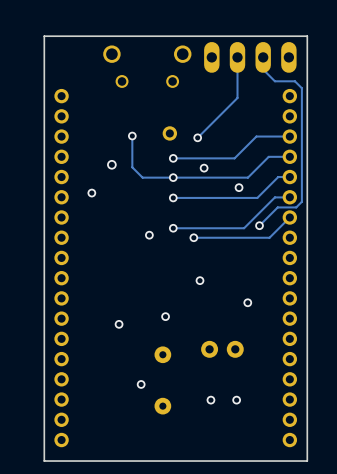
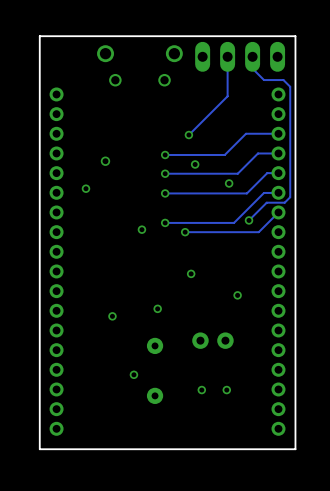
part: (169, 133) -> none
track: (132, 136) (132, 167) (142, 177) (173, 177) -> none
via: (132, 136) -> none

